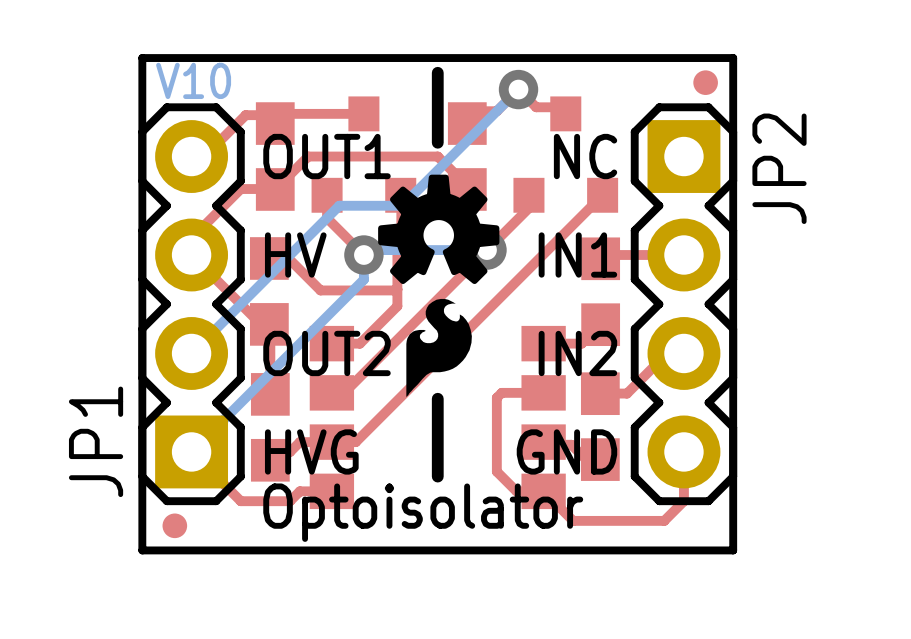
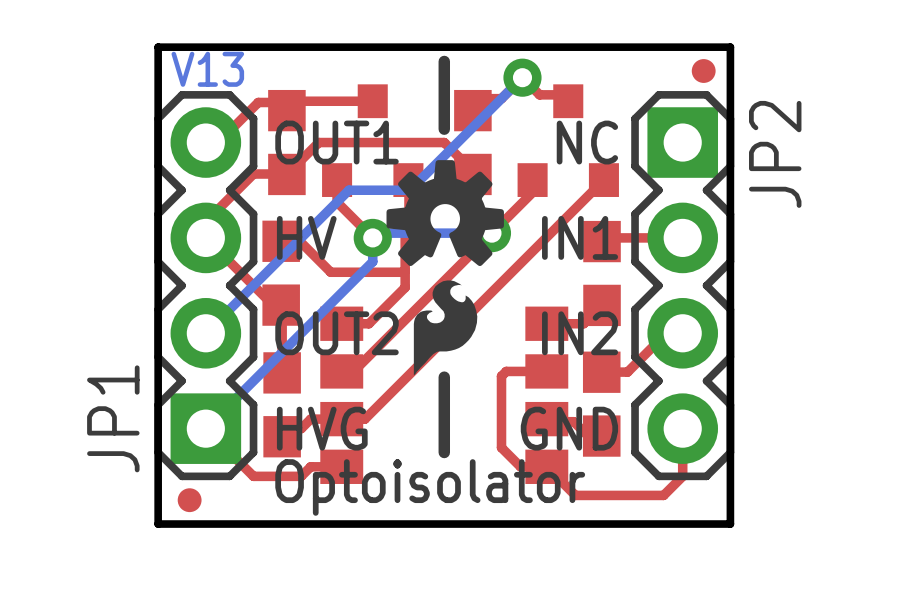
text: V10 (193, 80) -> V13 (207, 69)

